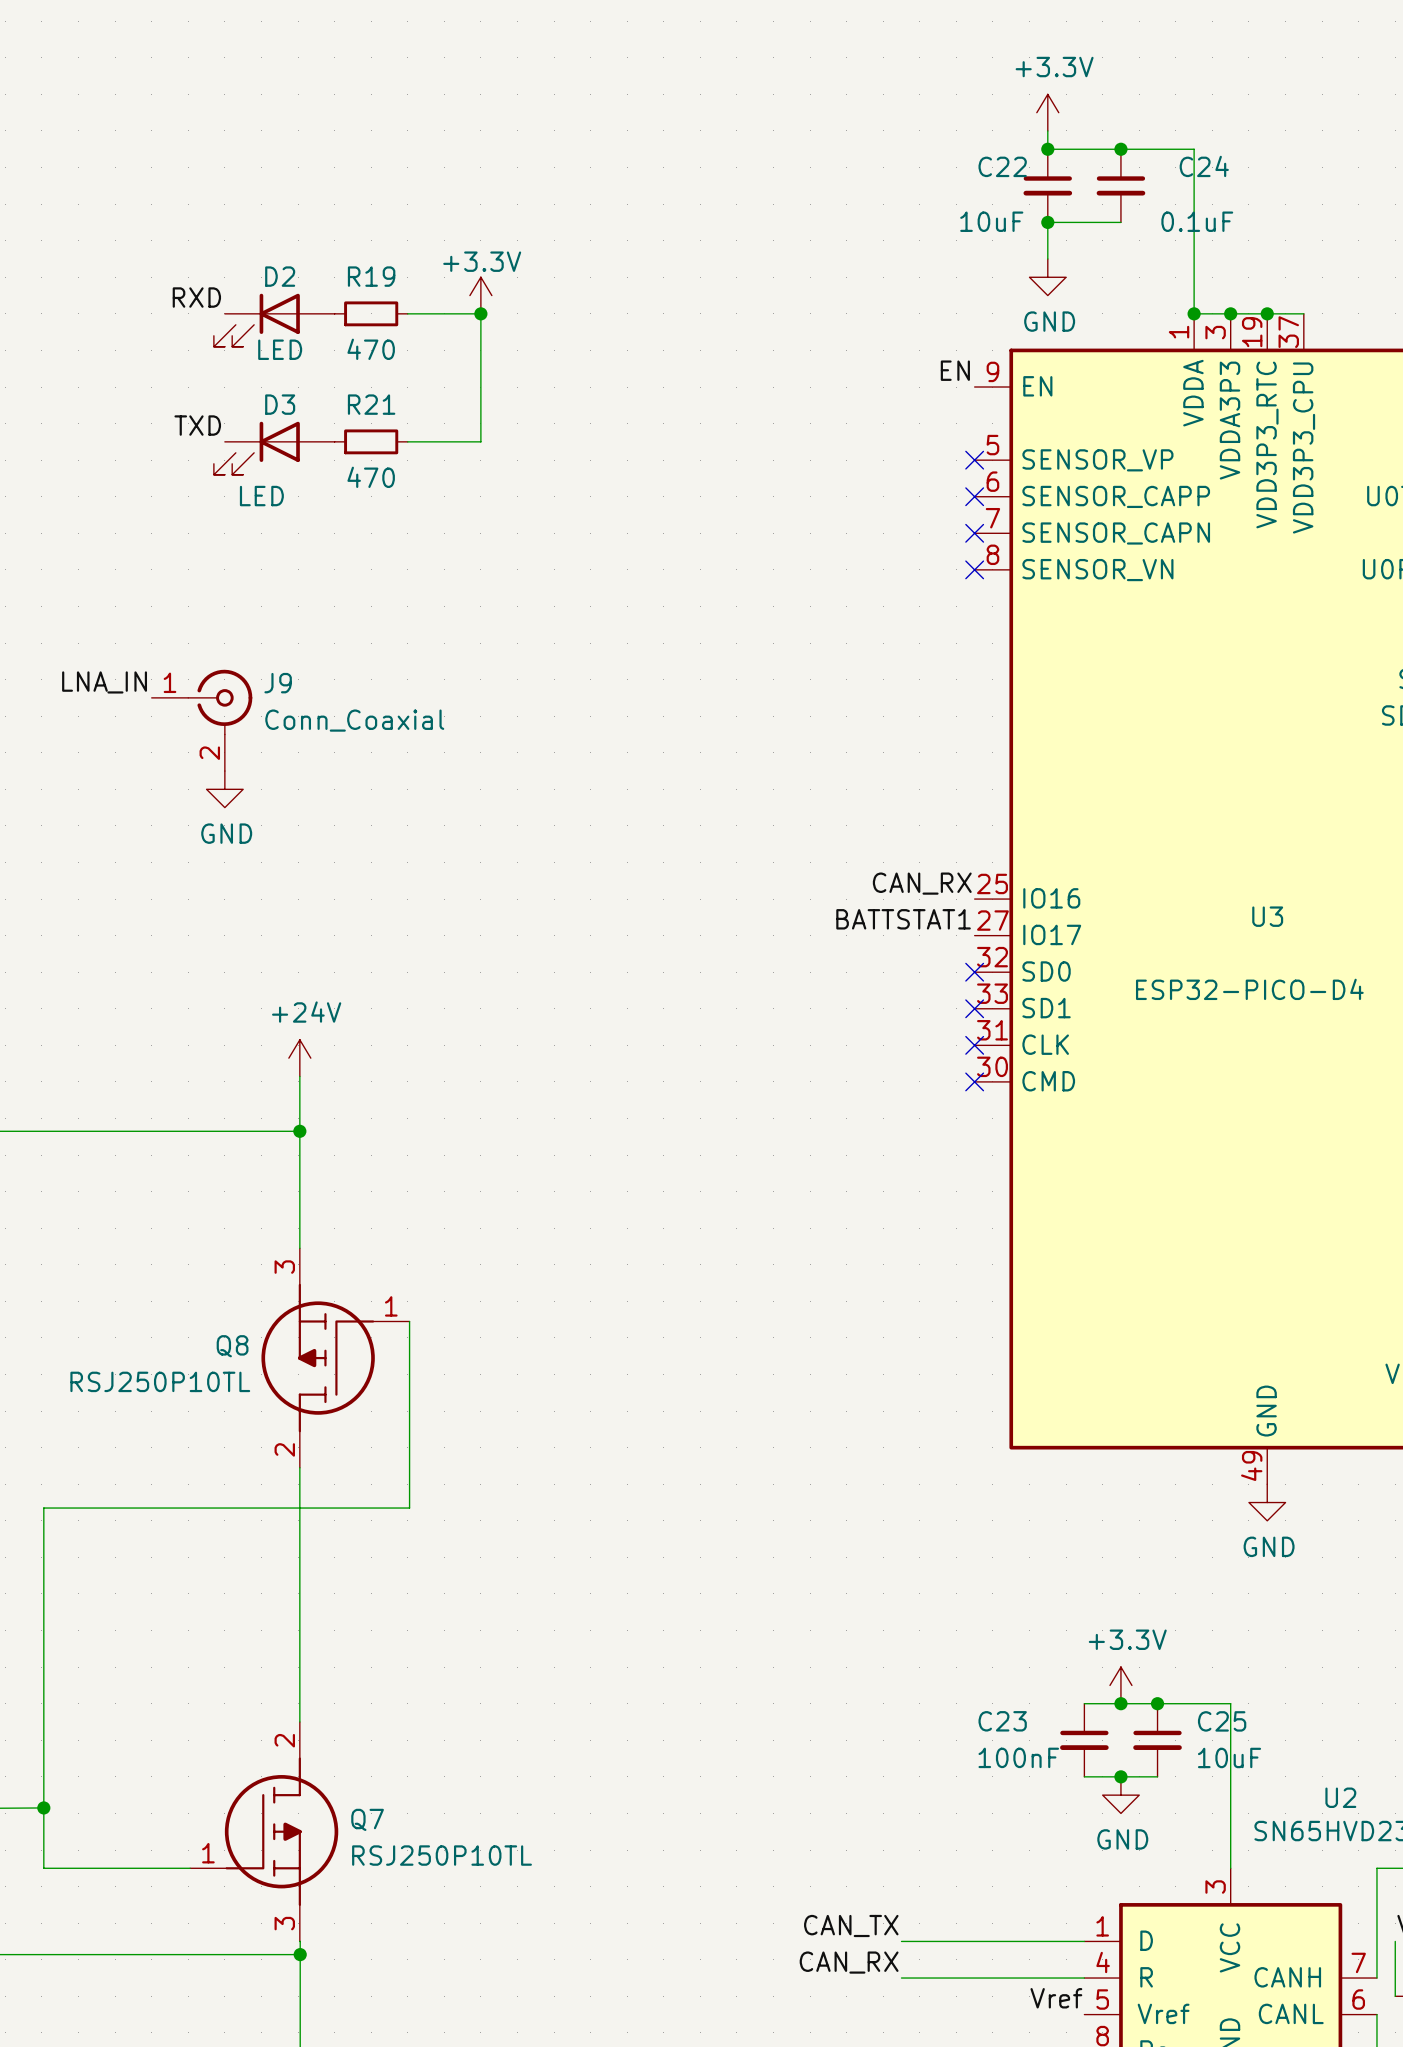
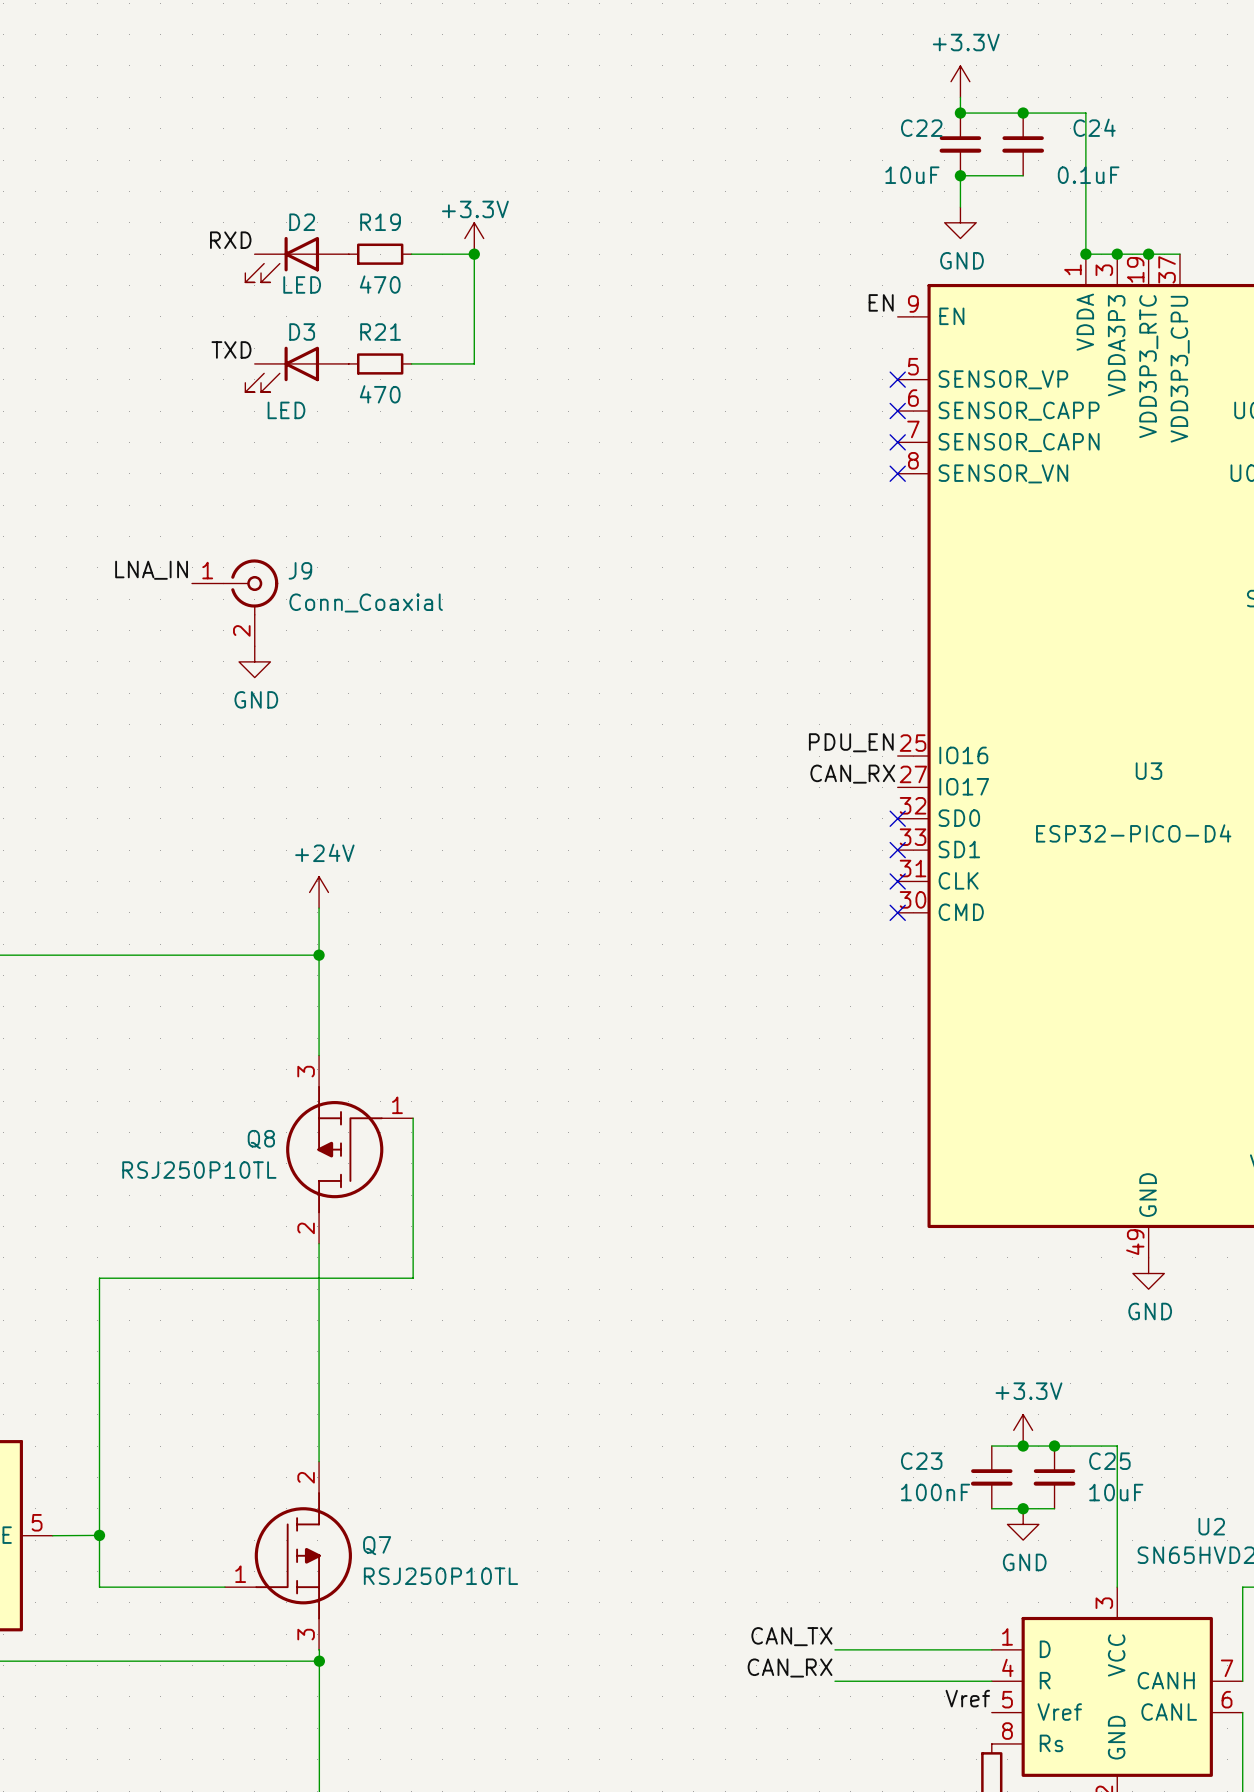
label: CAN_RX (922, 883) -> PDU_EN (851, 742)
label: BATTSTAT1 (903, 919) -> CAN_RX (852, 774)

